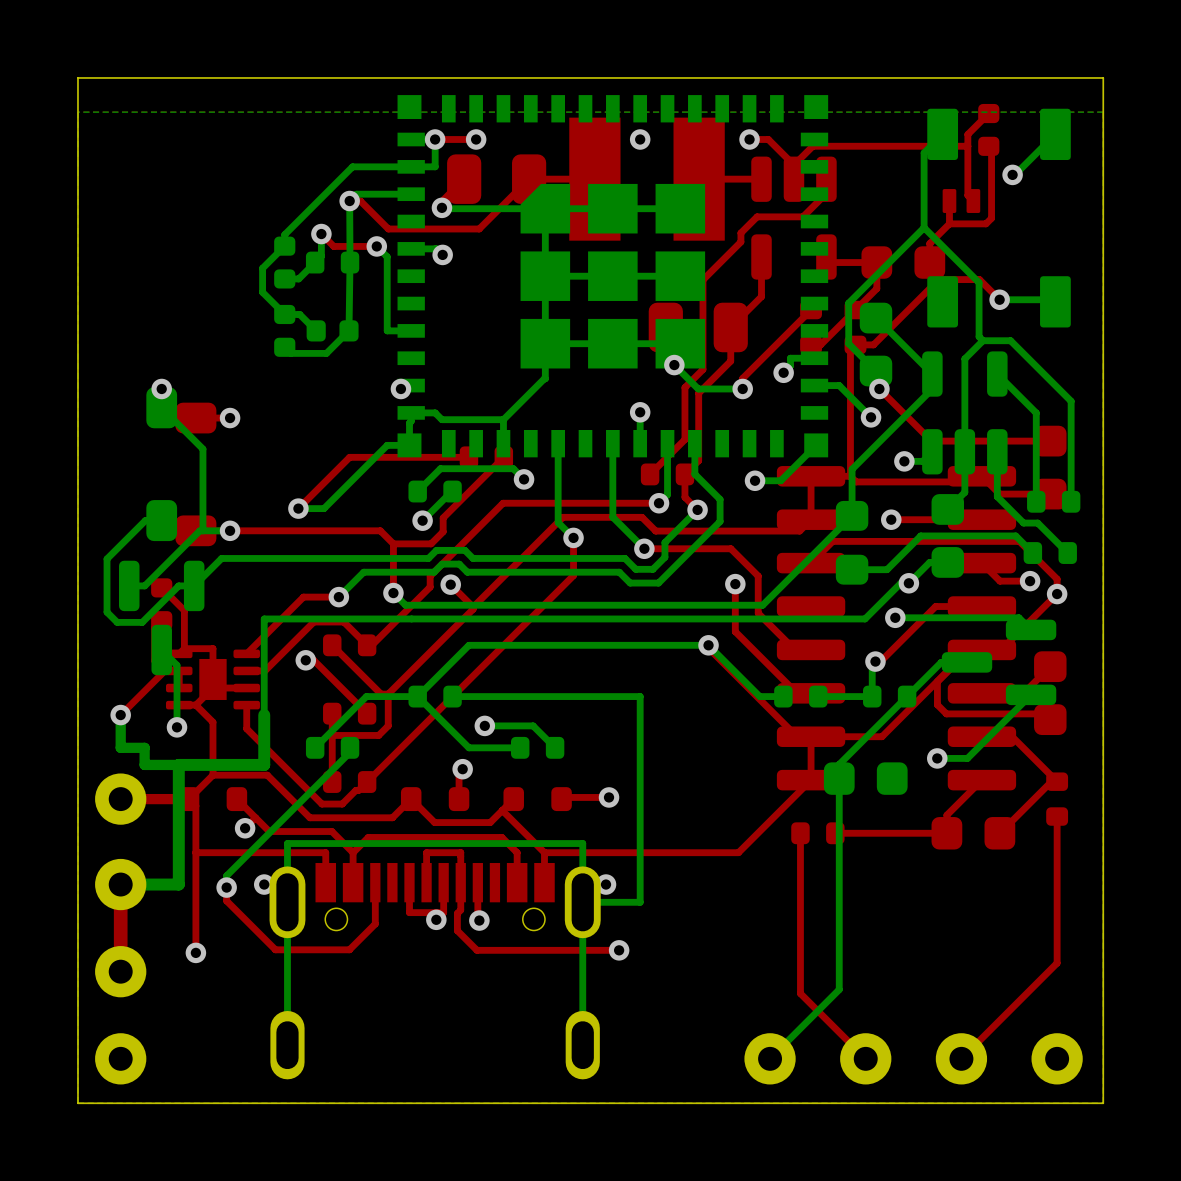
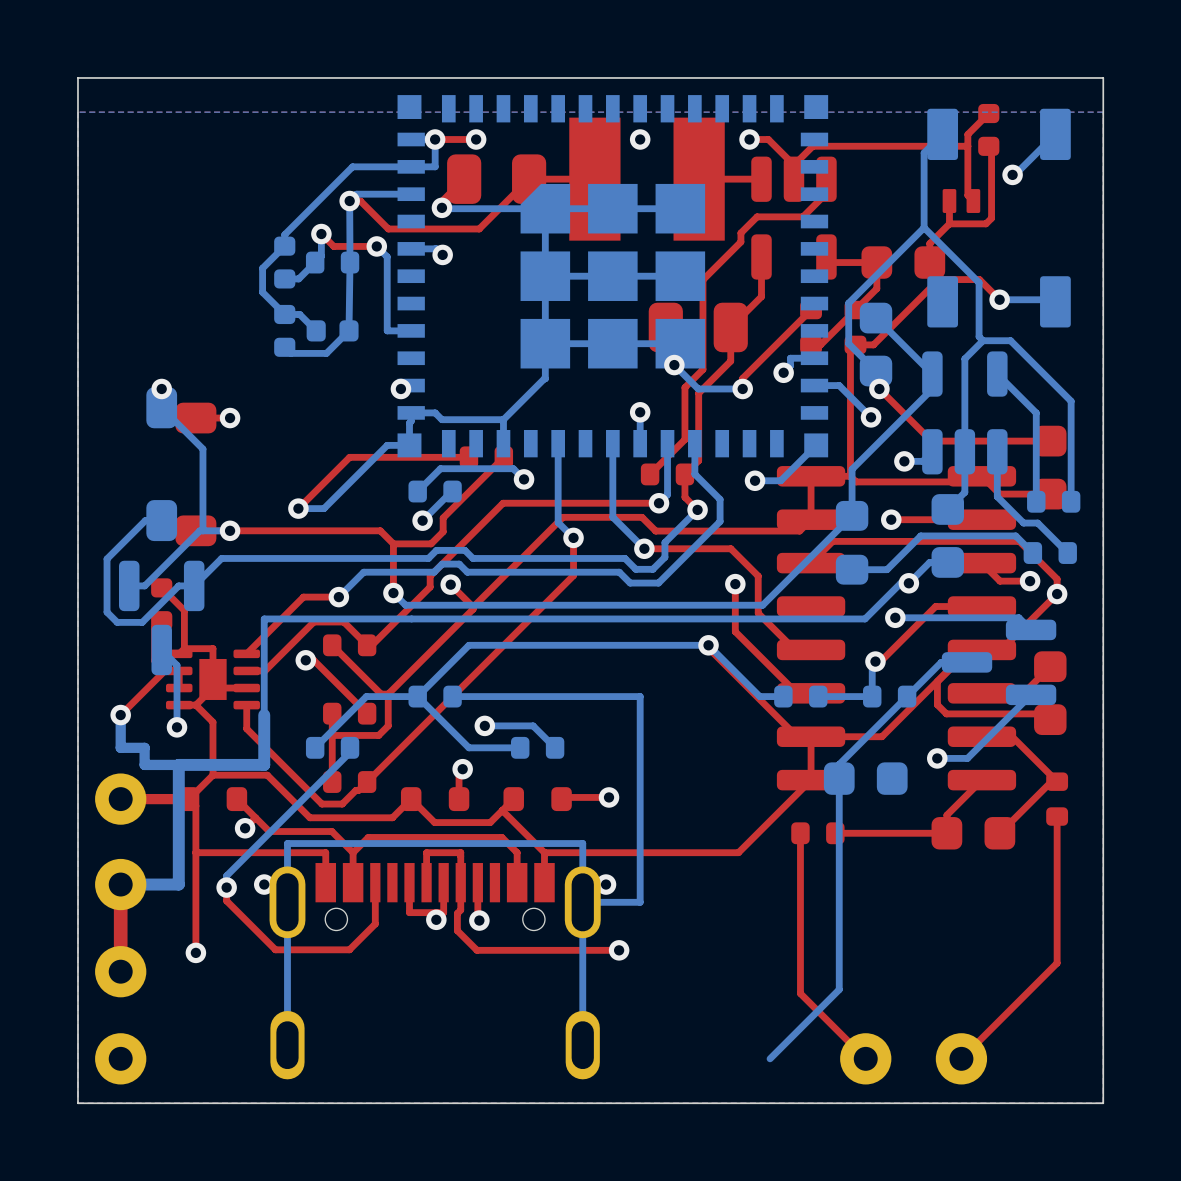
part: (770, 1058) -> none
part: (1057, 1058) -> none

